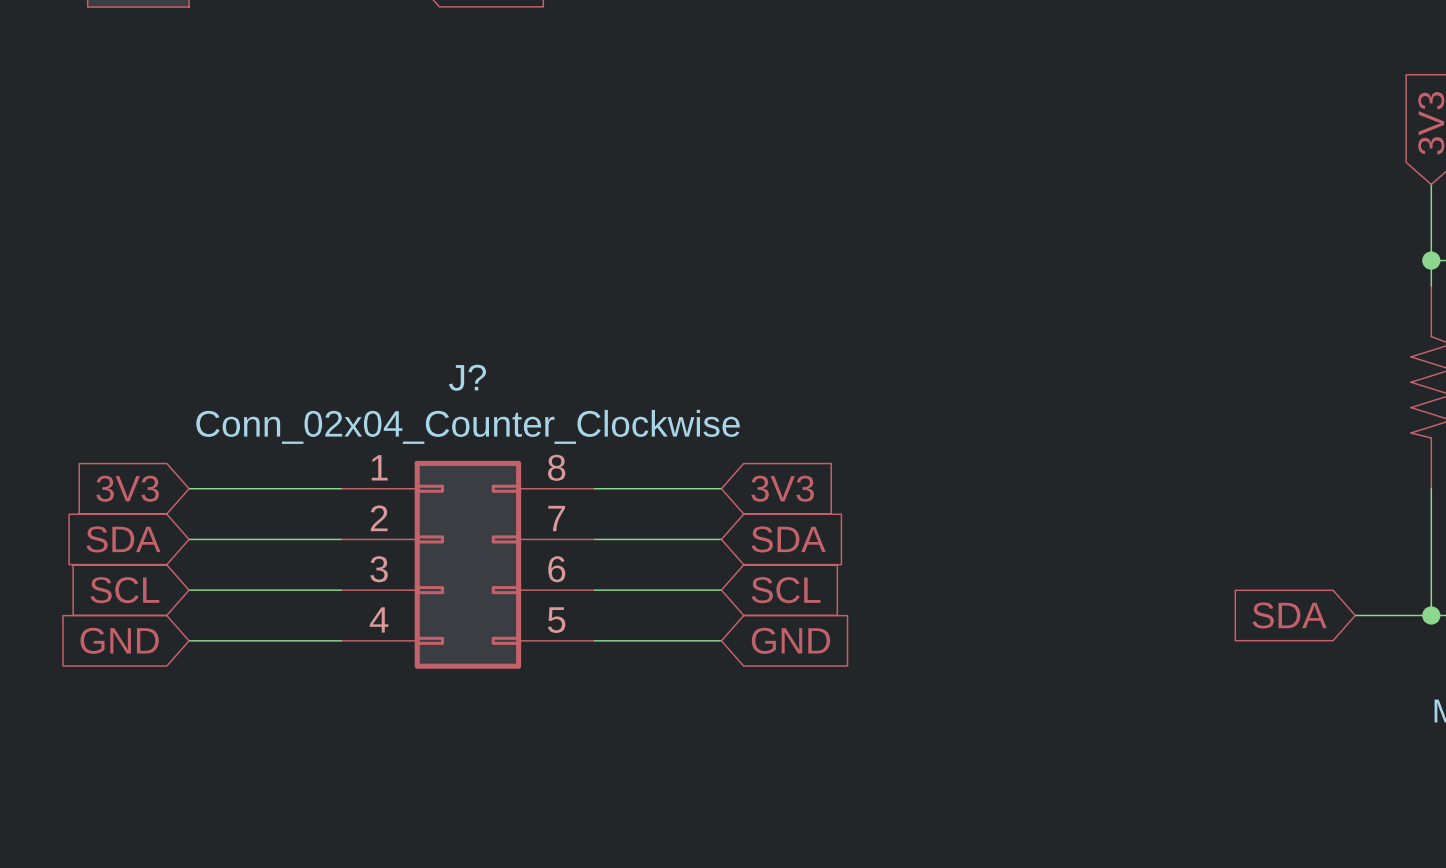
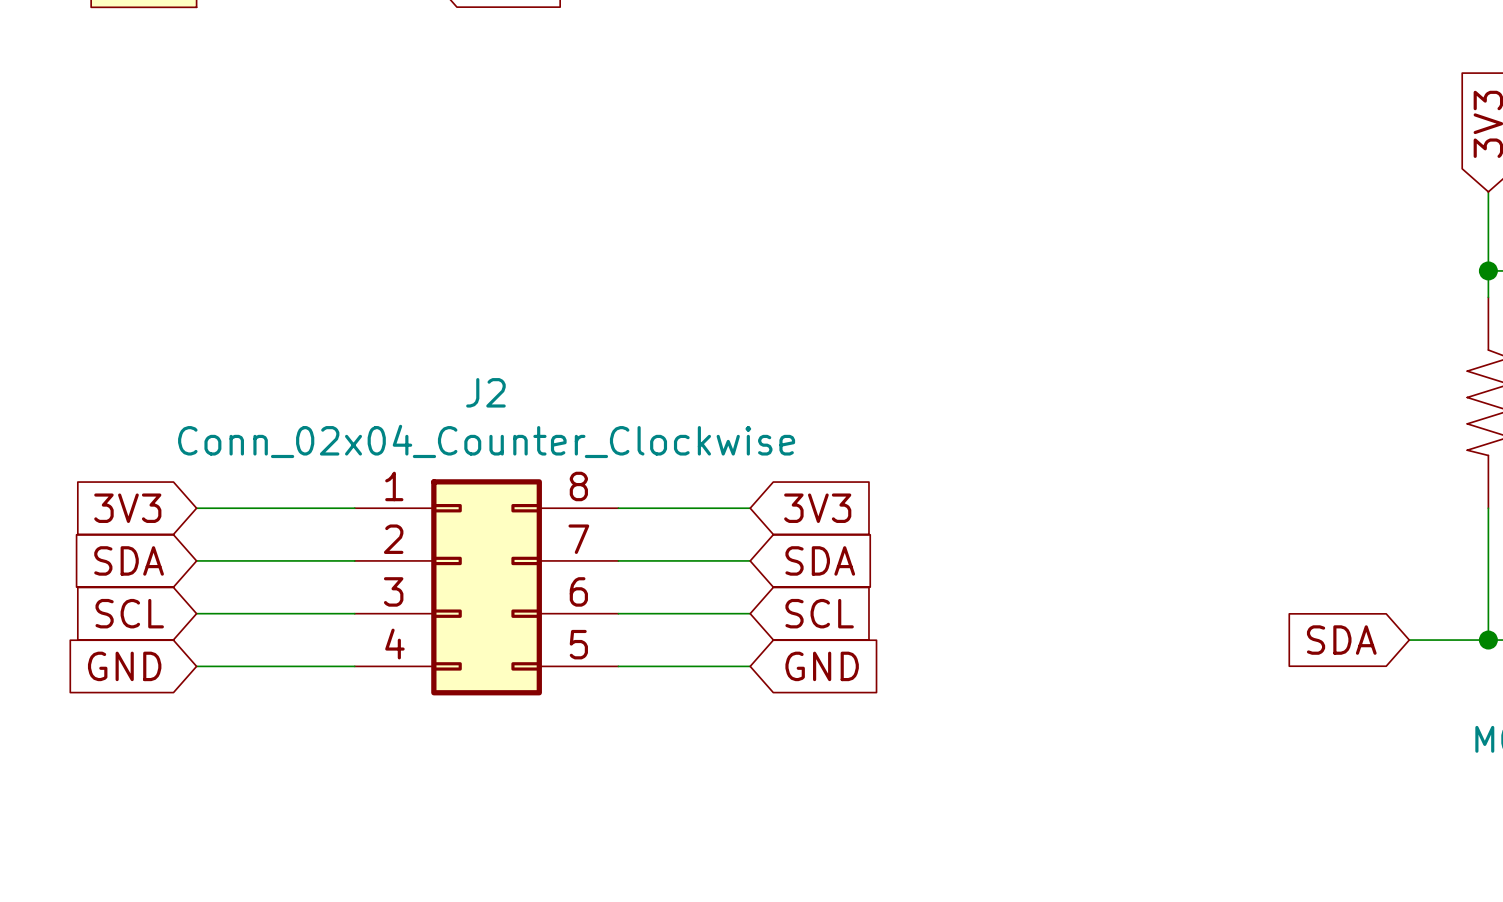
J? name: J? (467, 377) -> J2 (485, 392)

